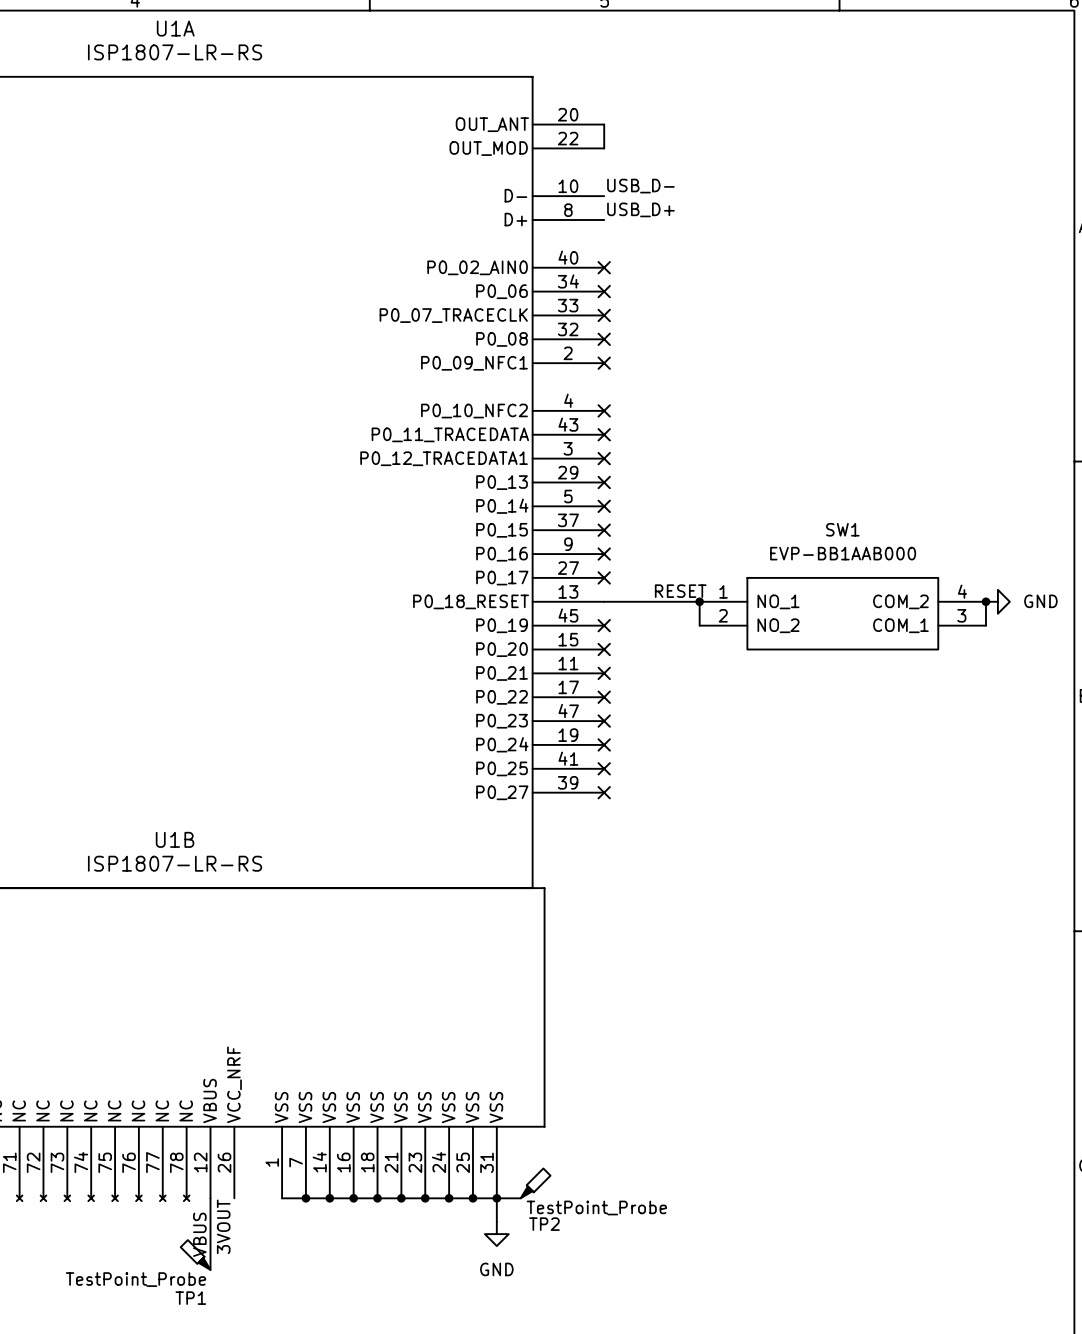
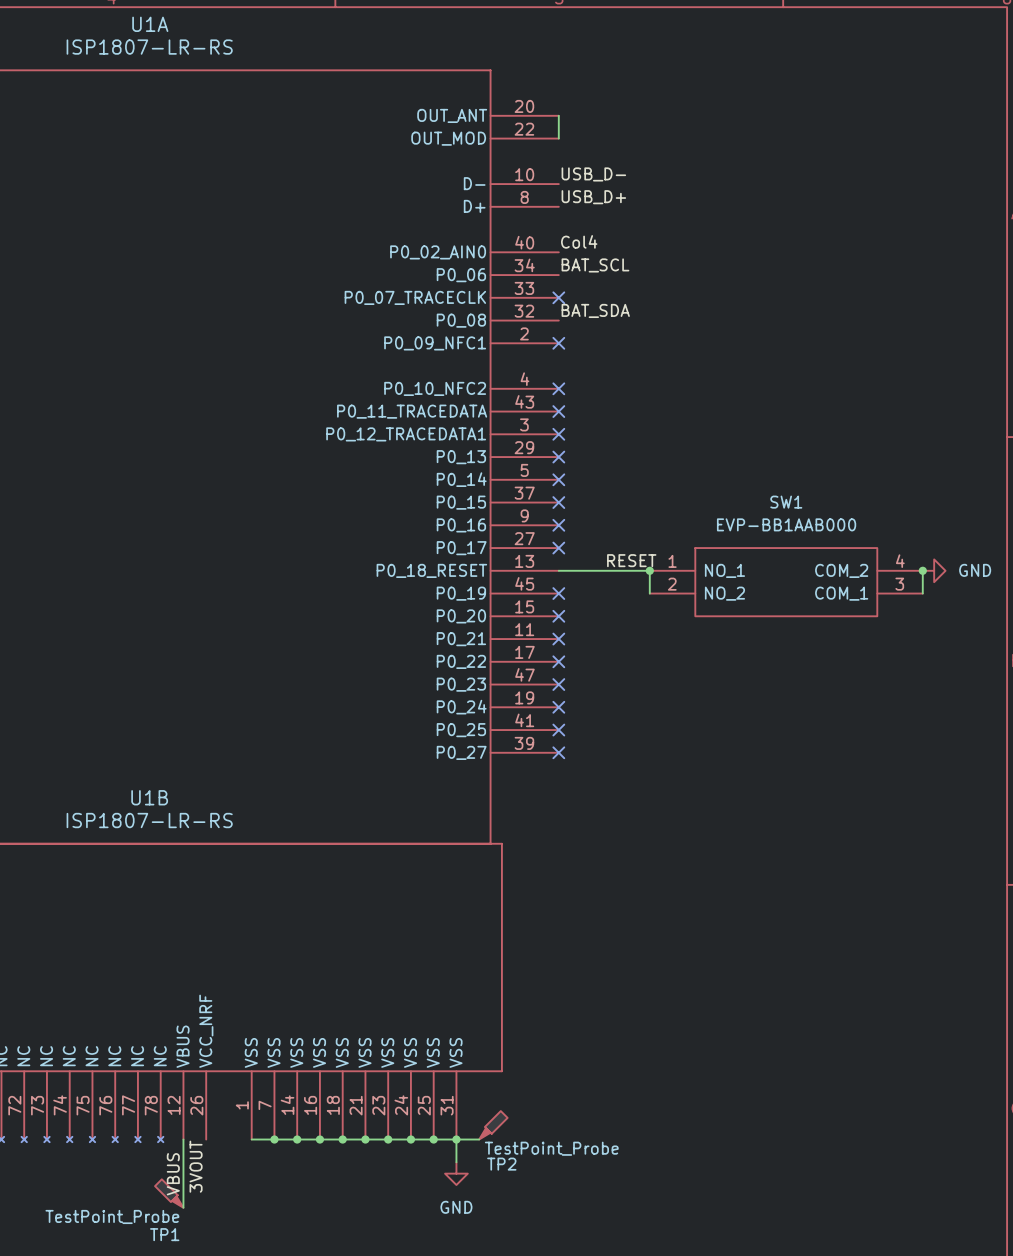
label: none -> Col4 (579, 241)
no-connect mark: (604, 267) -> none
label: none -> BAT_SCL (595, 265)
no-connect mark: (604, 291) -> none
label: none -> BAT_SDA (595, 310)
no-connect mark: (604, 339) -> none

